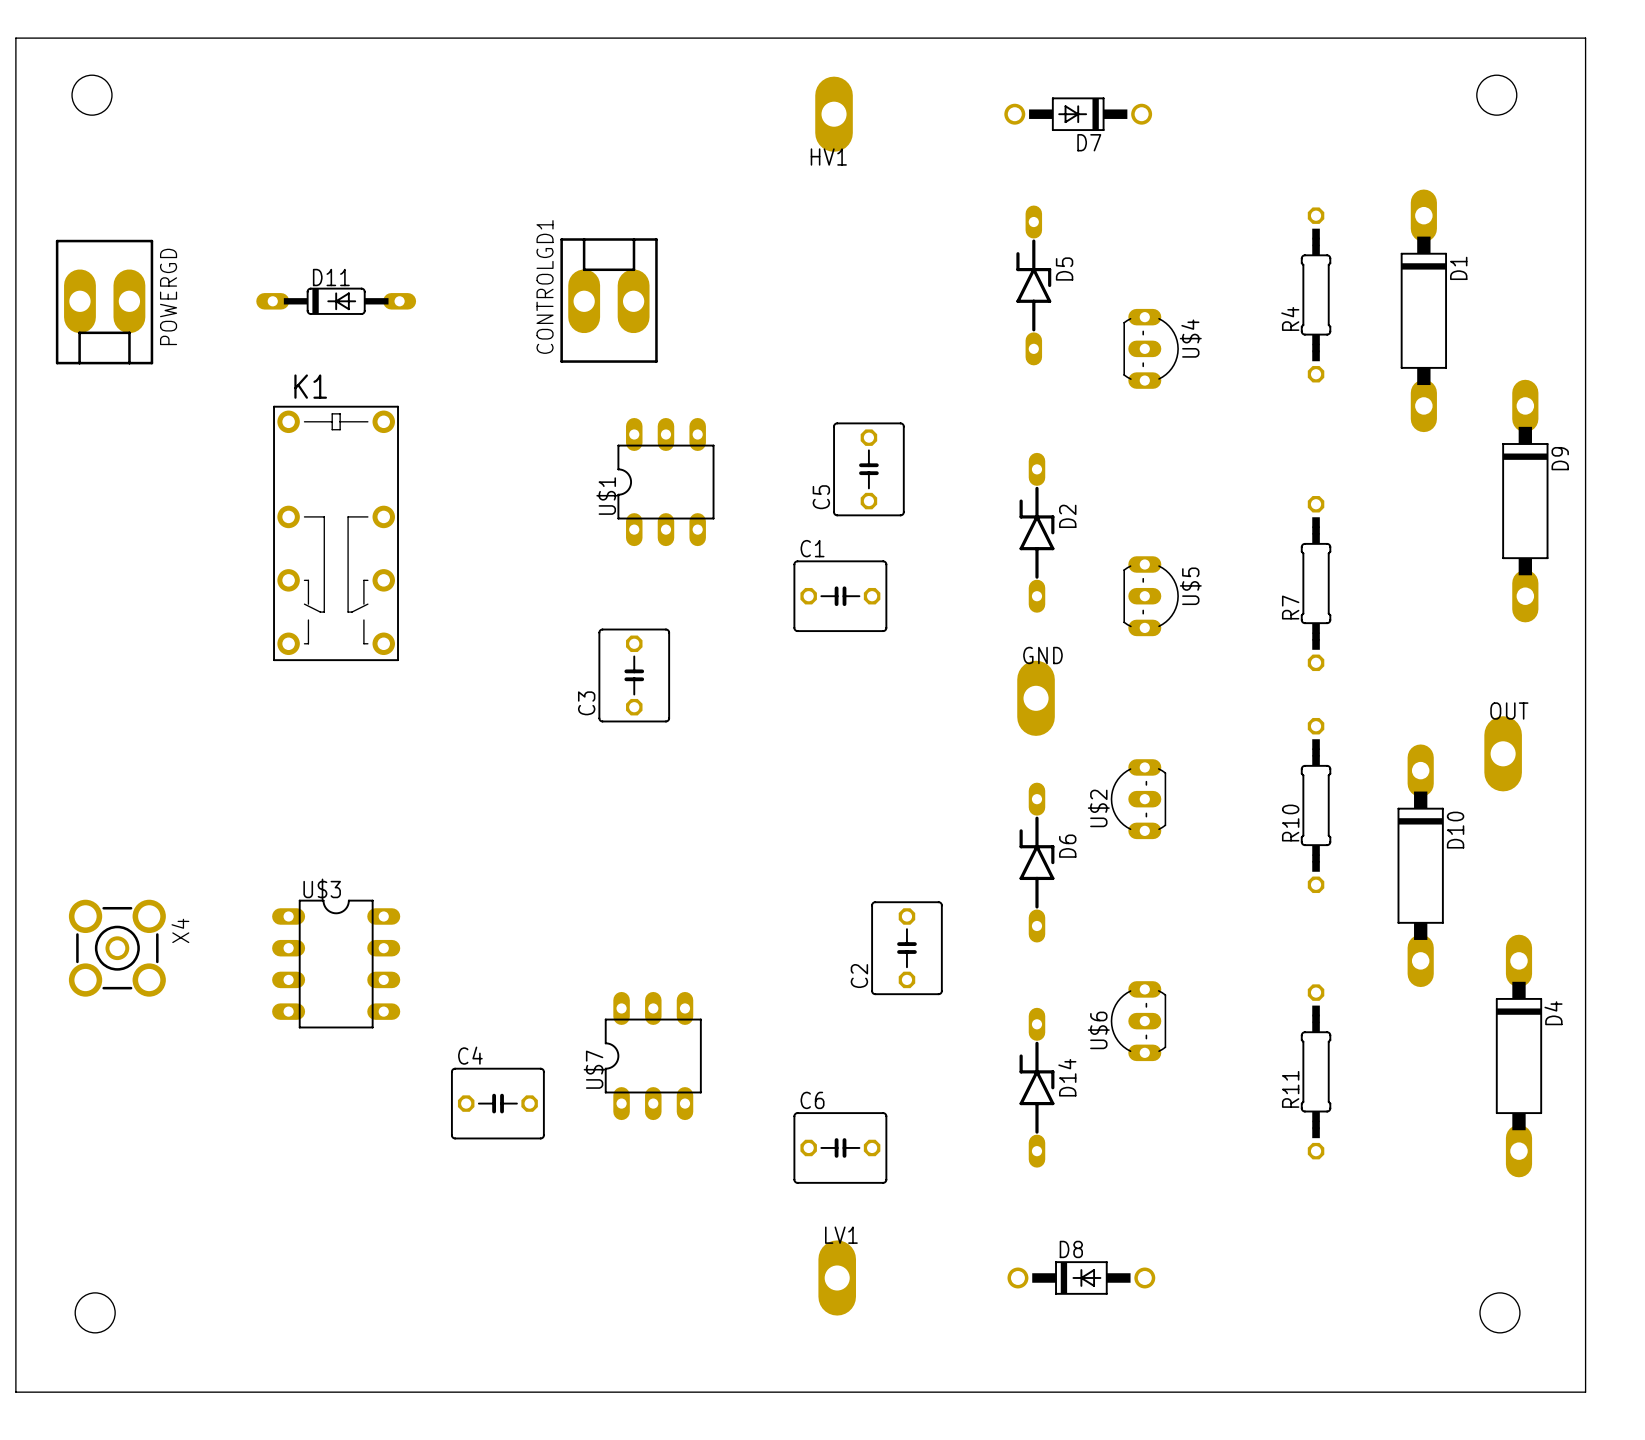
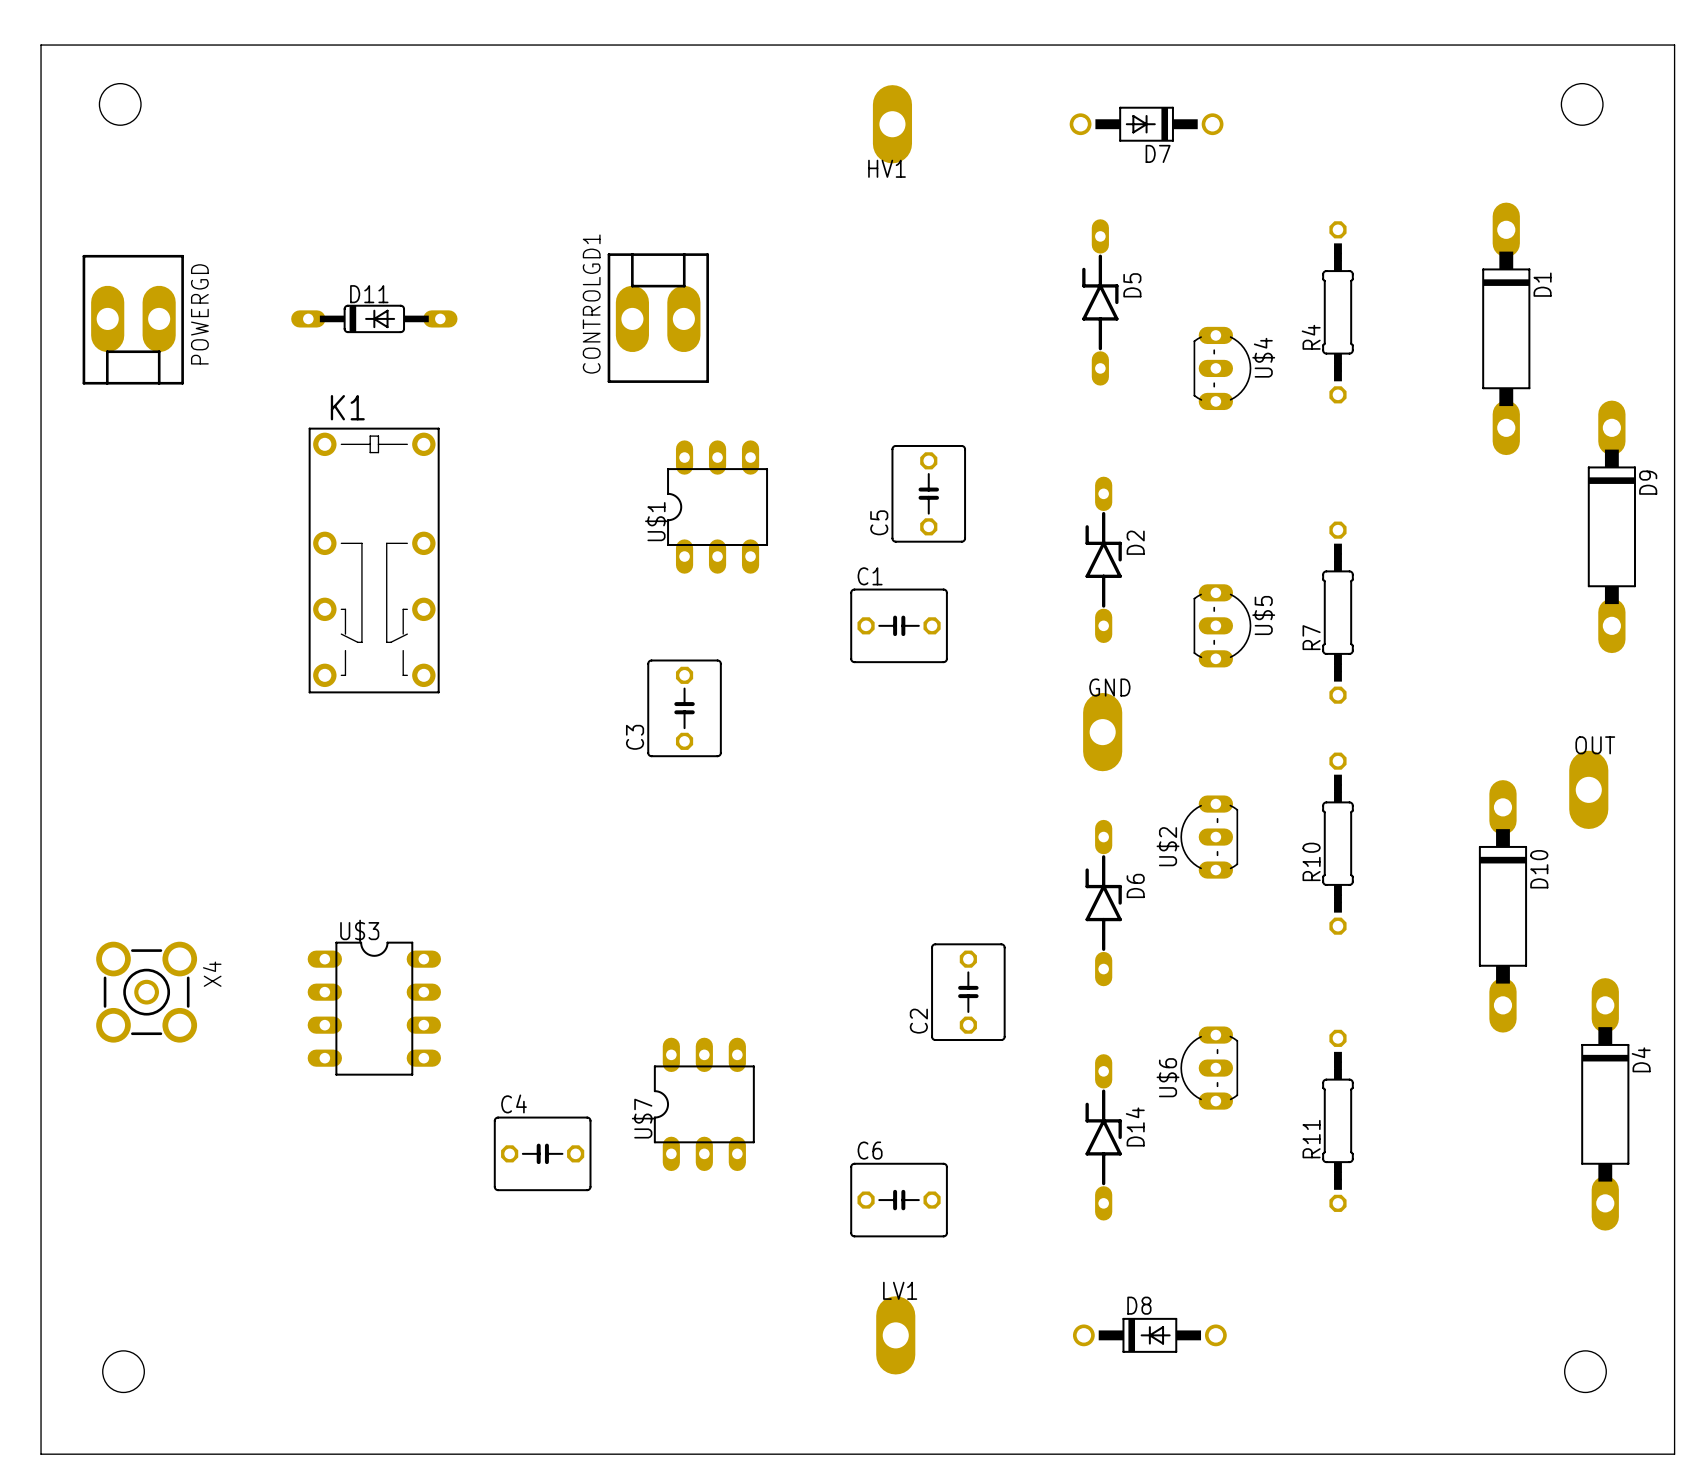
R4 position: (1316, 294) -> (1337, 312)
R7 position: (1316, 583) -> (1337, 612)
R10 position: (1316, 805) -> (1337, 843)
R11 position: (1316, 1071) -> (1337, 1120)

